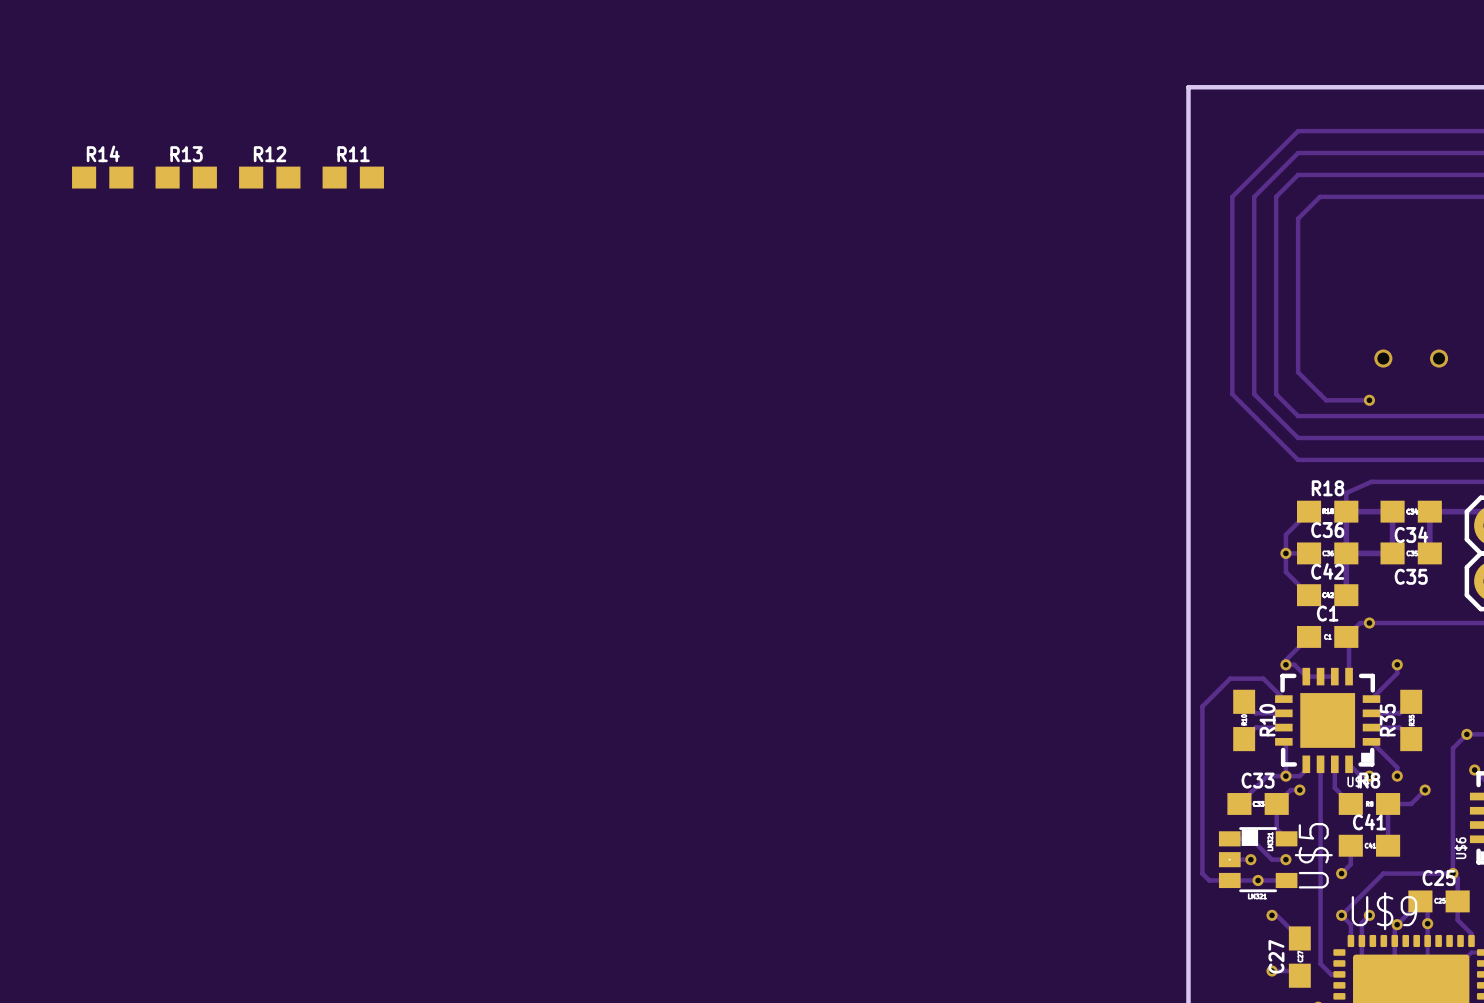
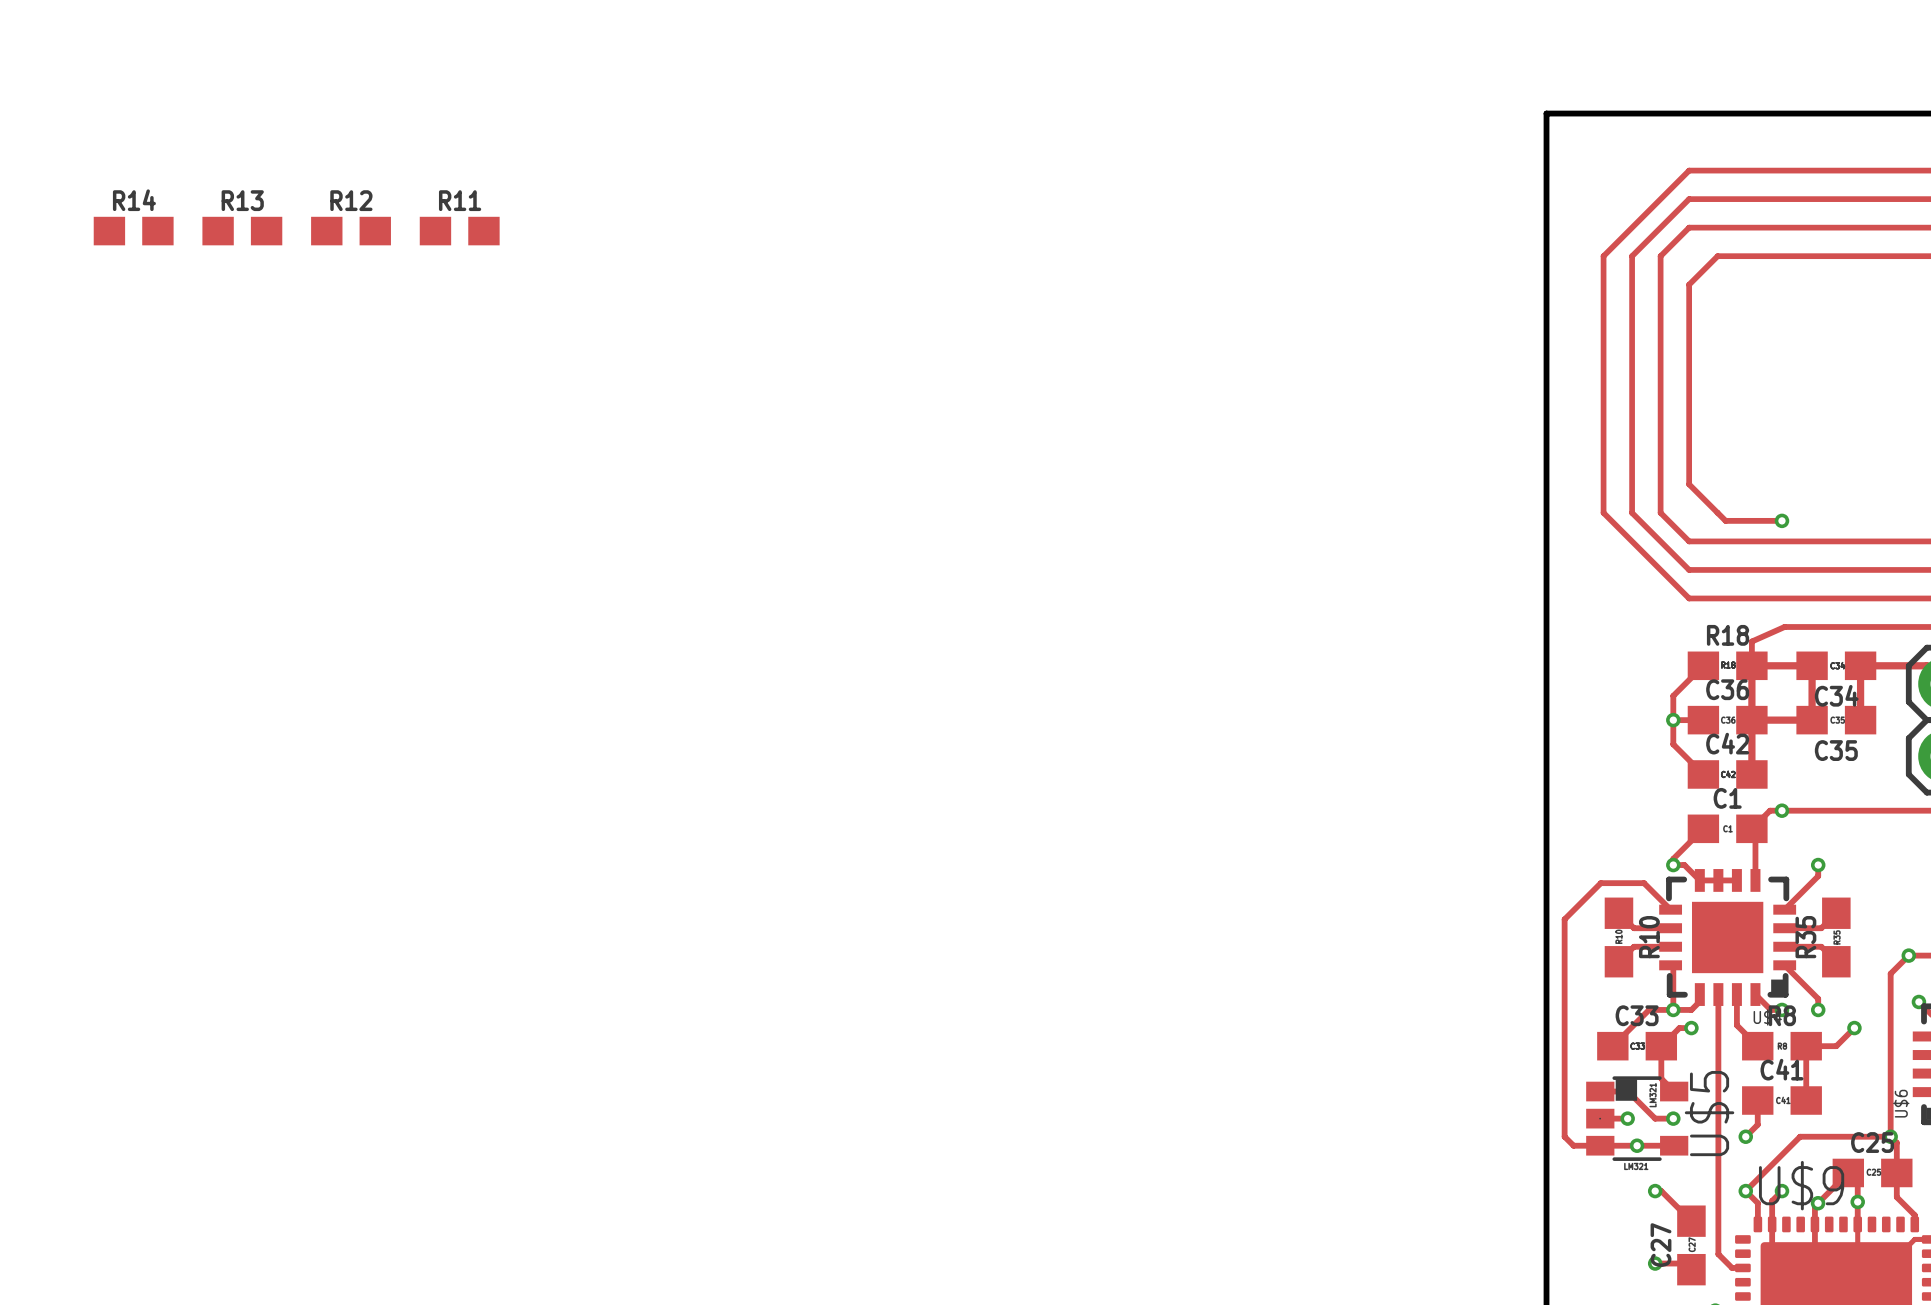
via: (1383, 358) -> none
via: (1439, 358) -> none

